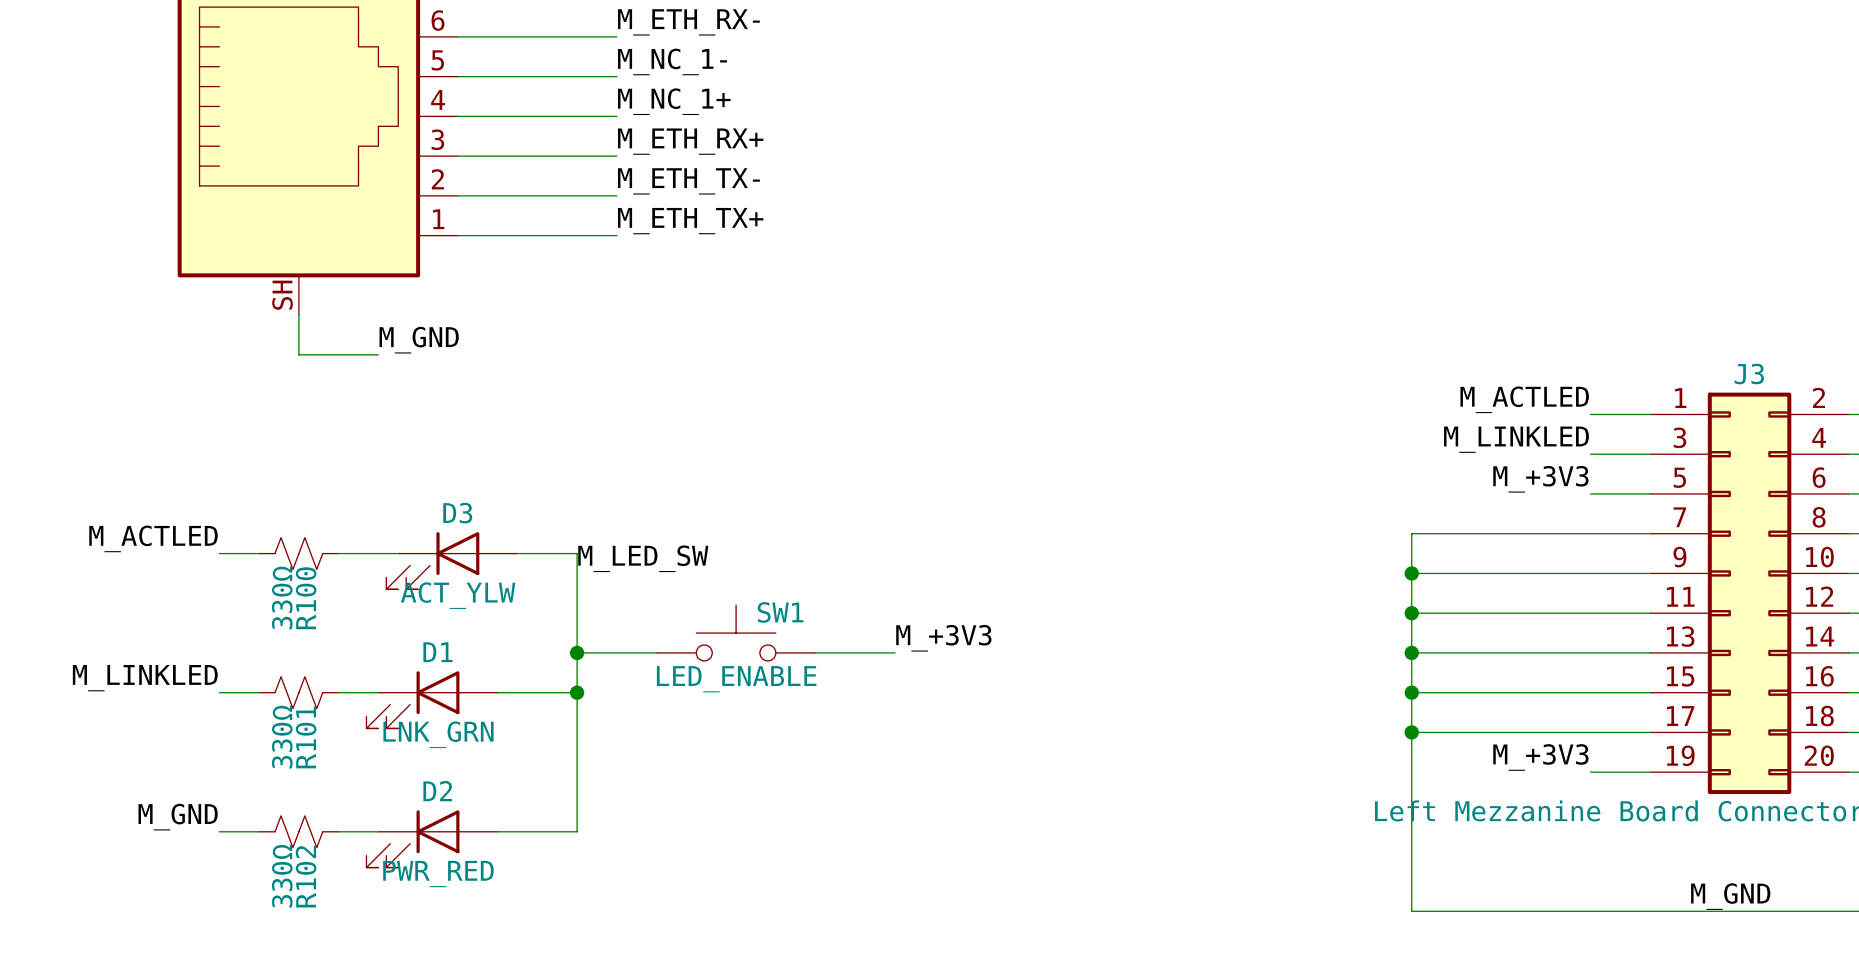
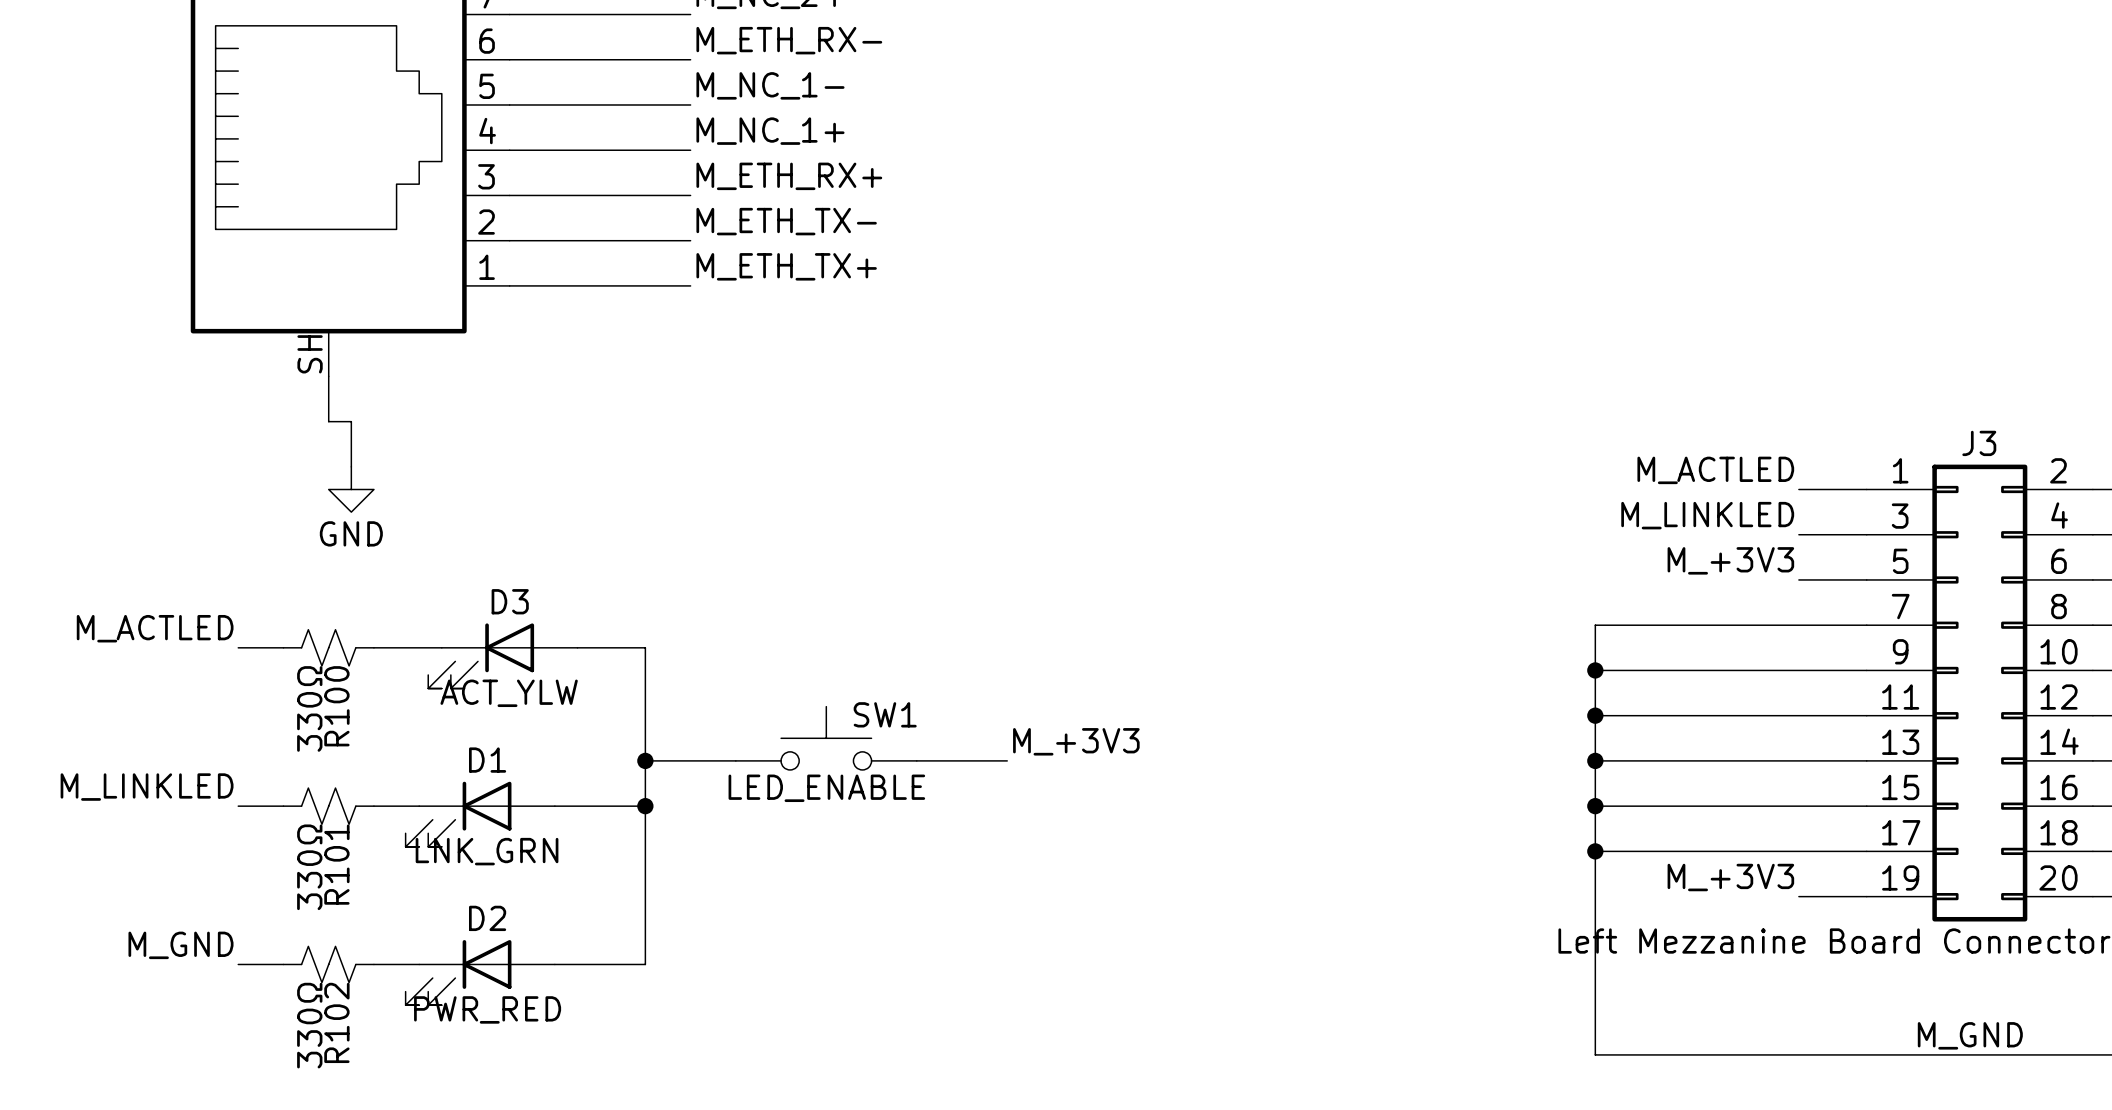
label: M_GND (419, 340) -> none
wire: (318, 354) (378, 354) -> (351, 421) (351, 466)
power symbol: none -> GND (351, 489)
label: M_LED_SW (643, 558) -> none

